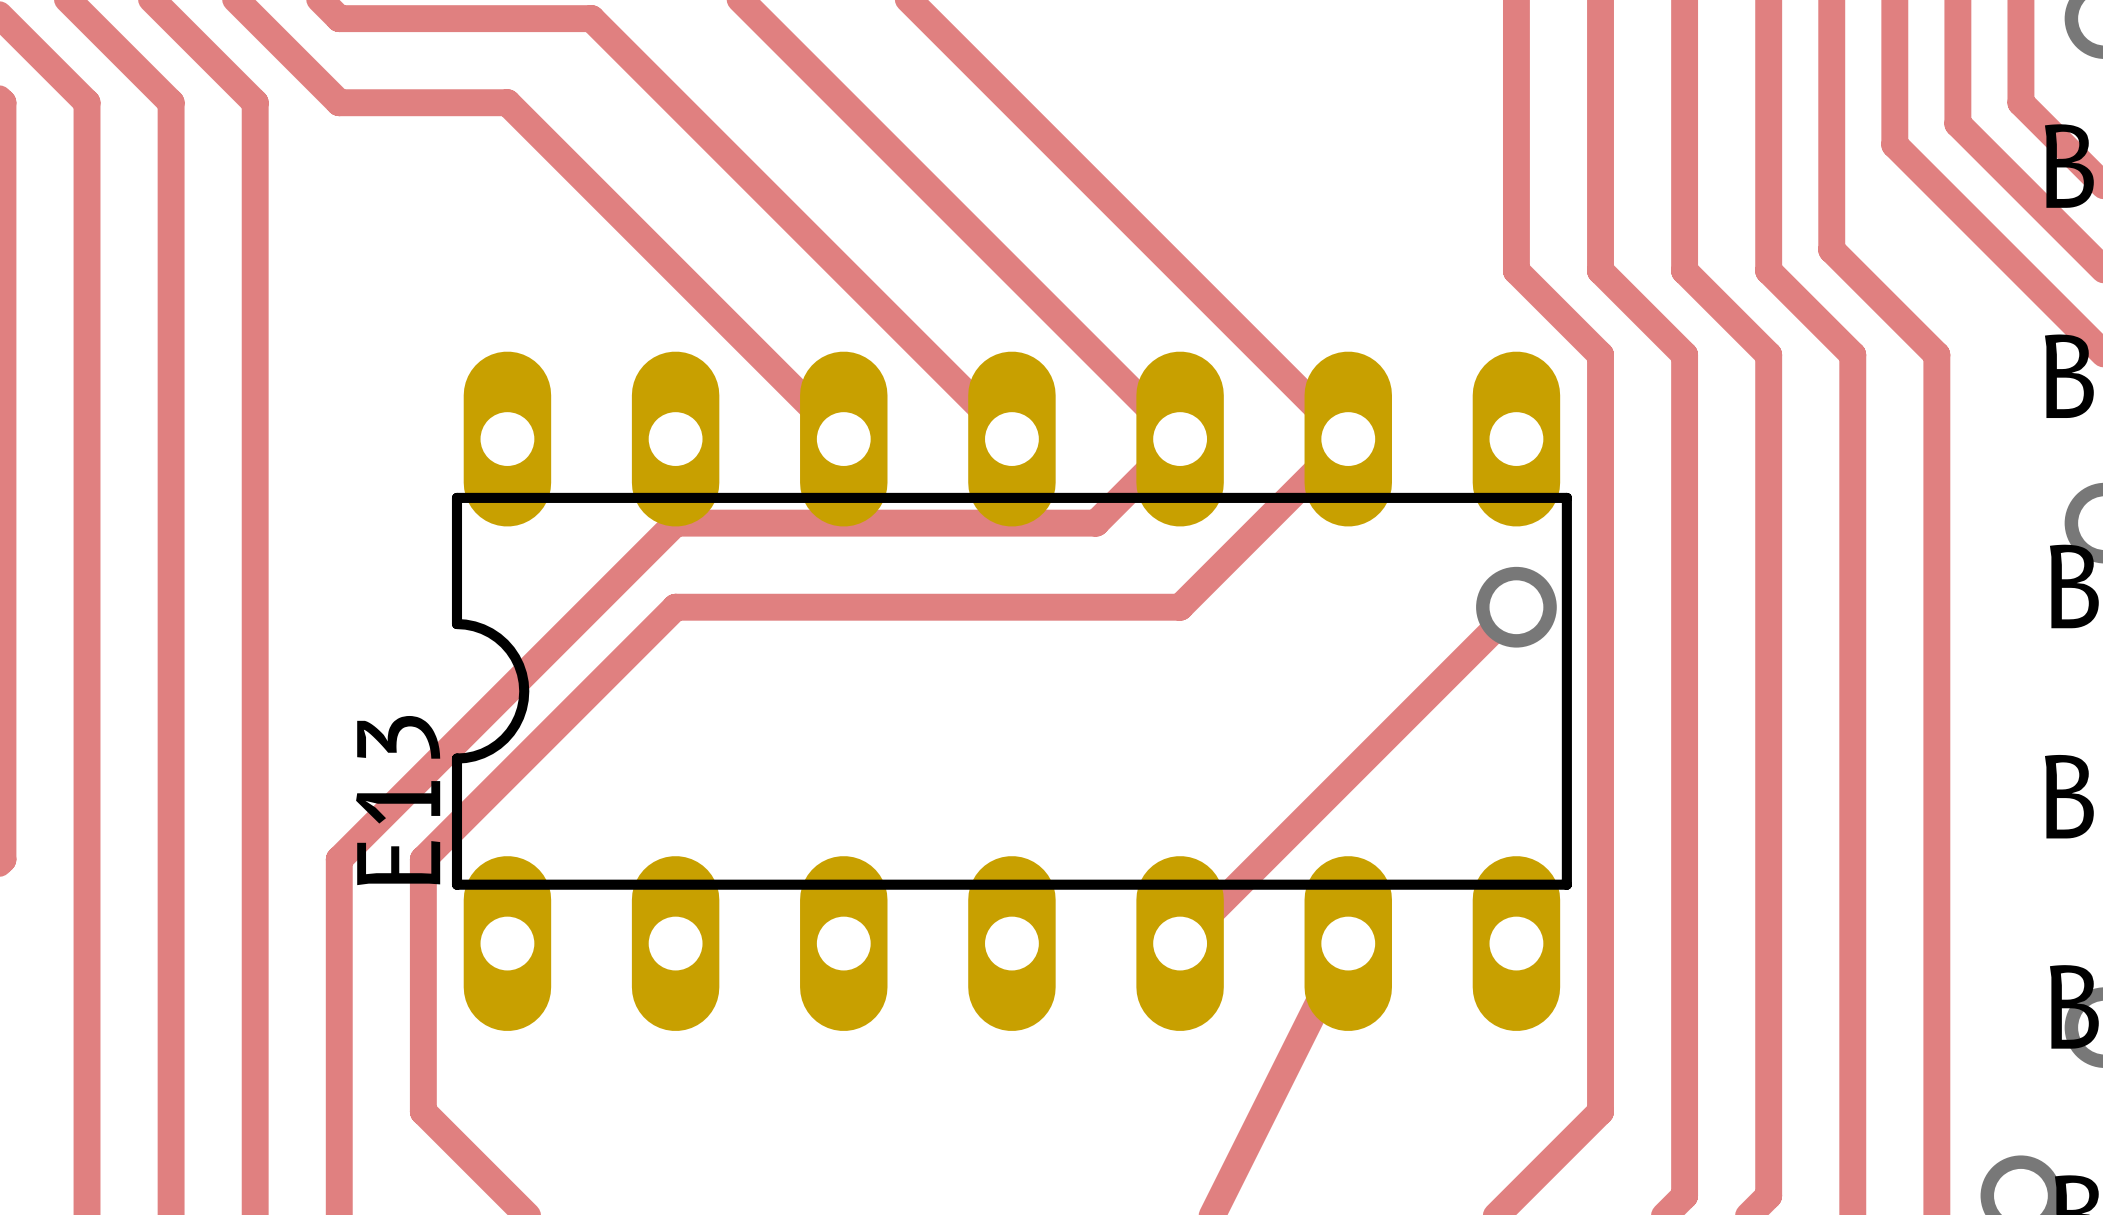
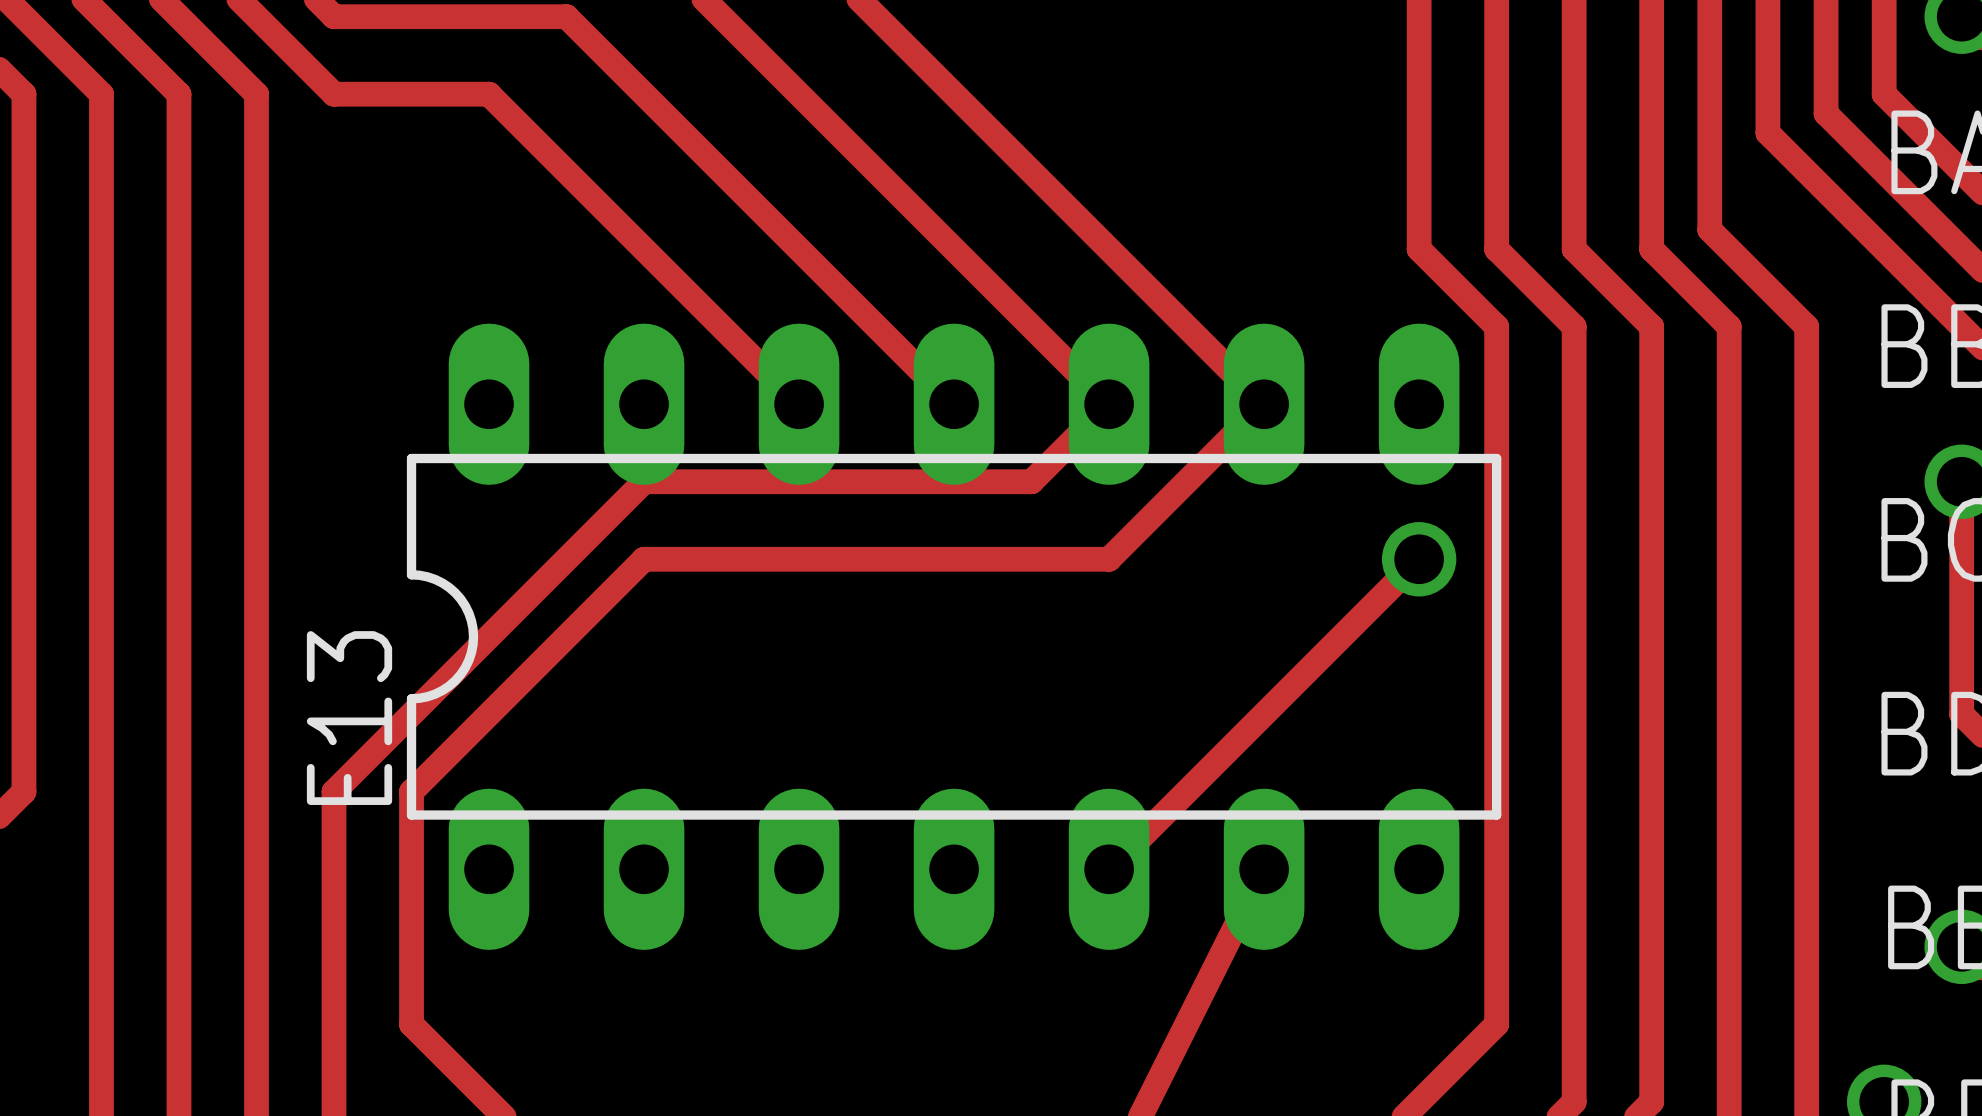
E13 footprint: [451, 351, 1572, 1032] -> [406, 323, 1502, 950]
E13 name position: E13 (398, 800) -> E13 (349, 718)

